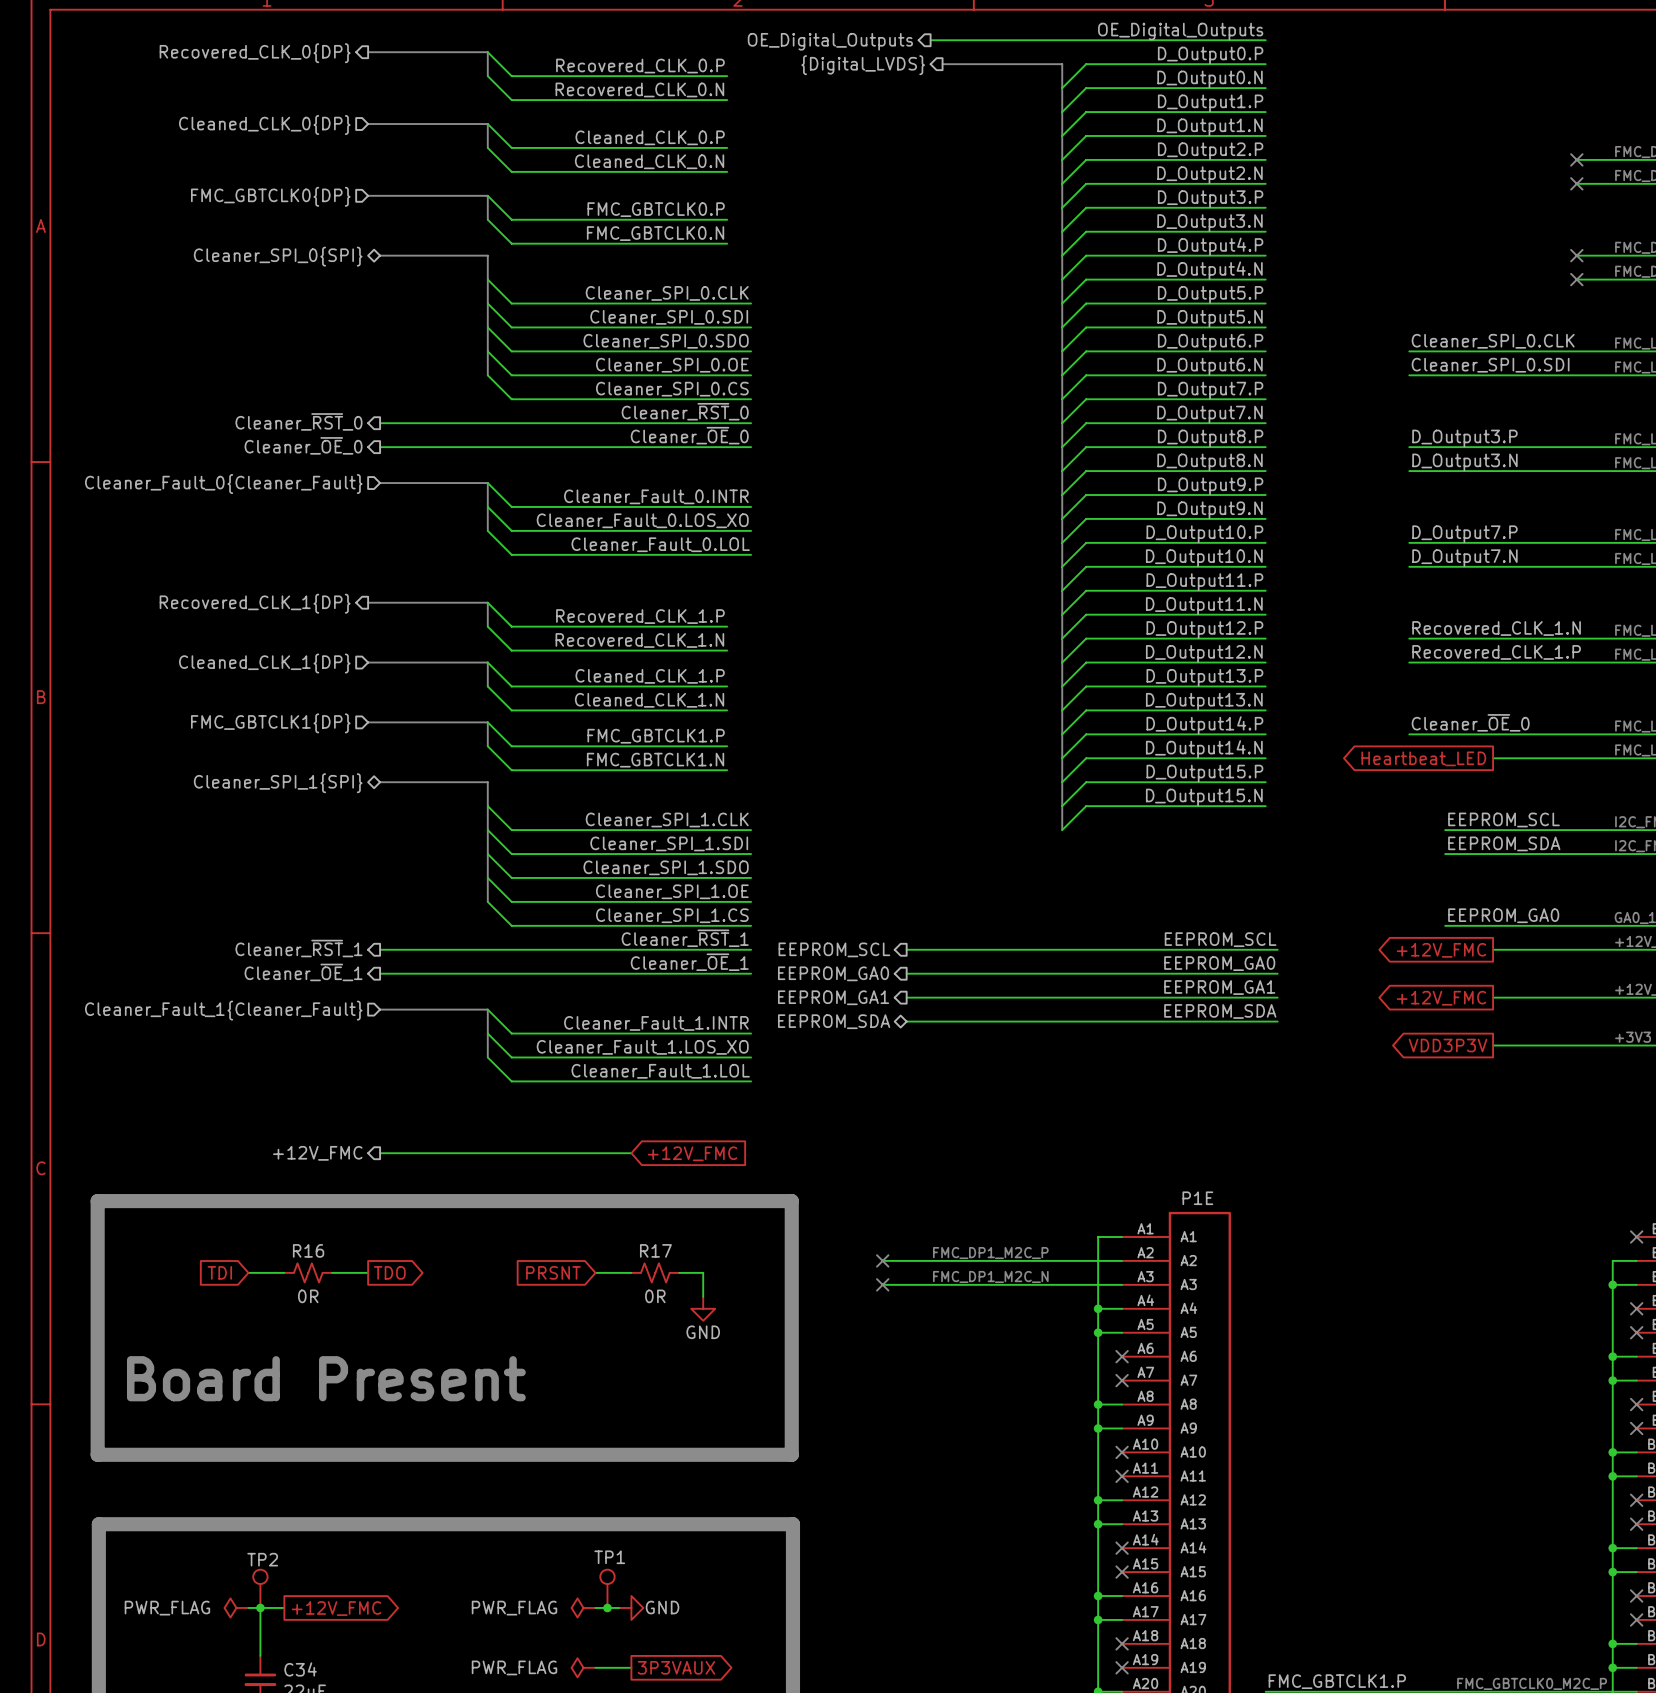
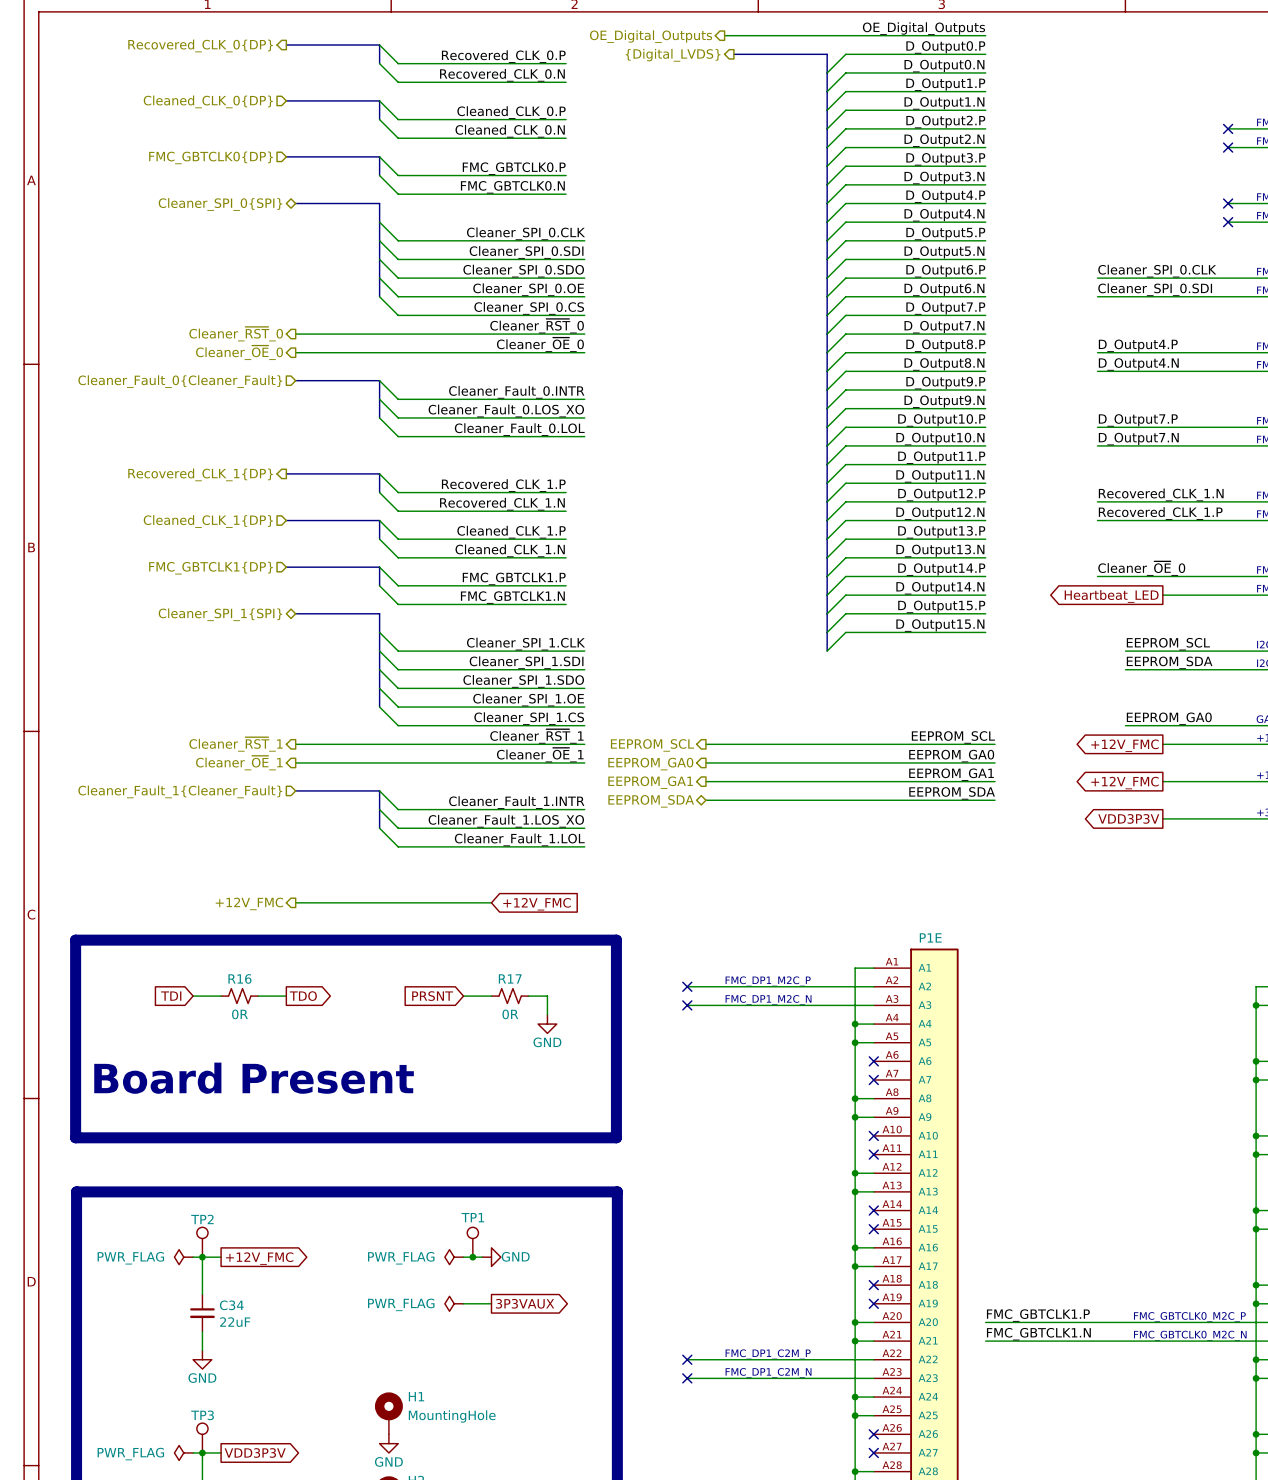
label: D_Output3.P (1464, 438) -> D_Output4.P (1138, 345)
label: D_Output3.N (1464, 462) -> D_Output4.N (1138, 364)

